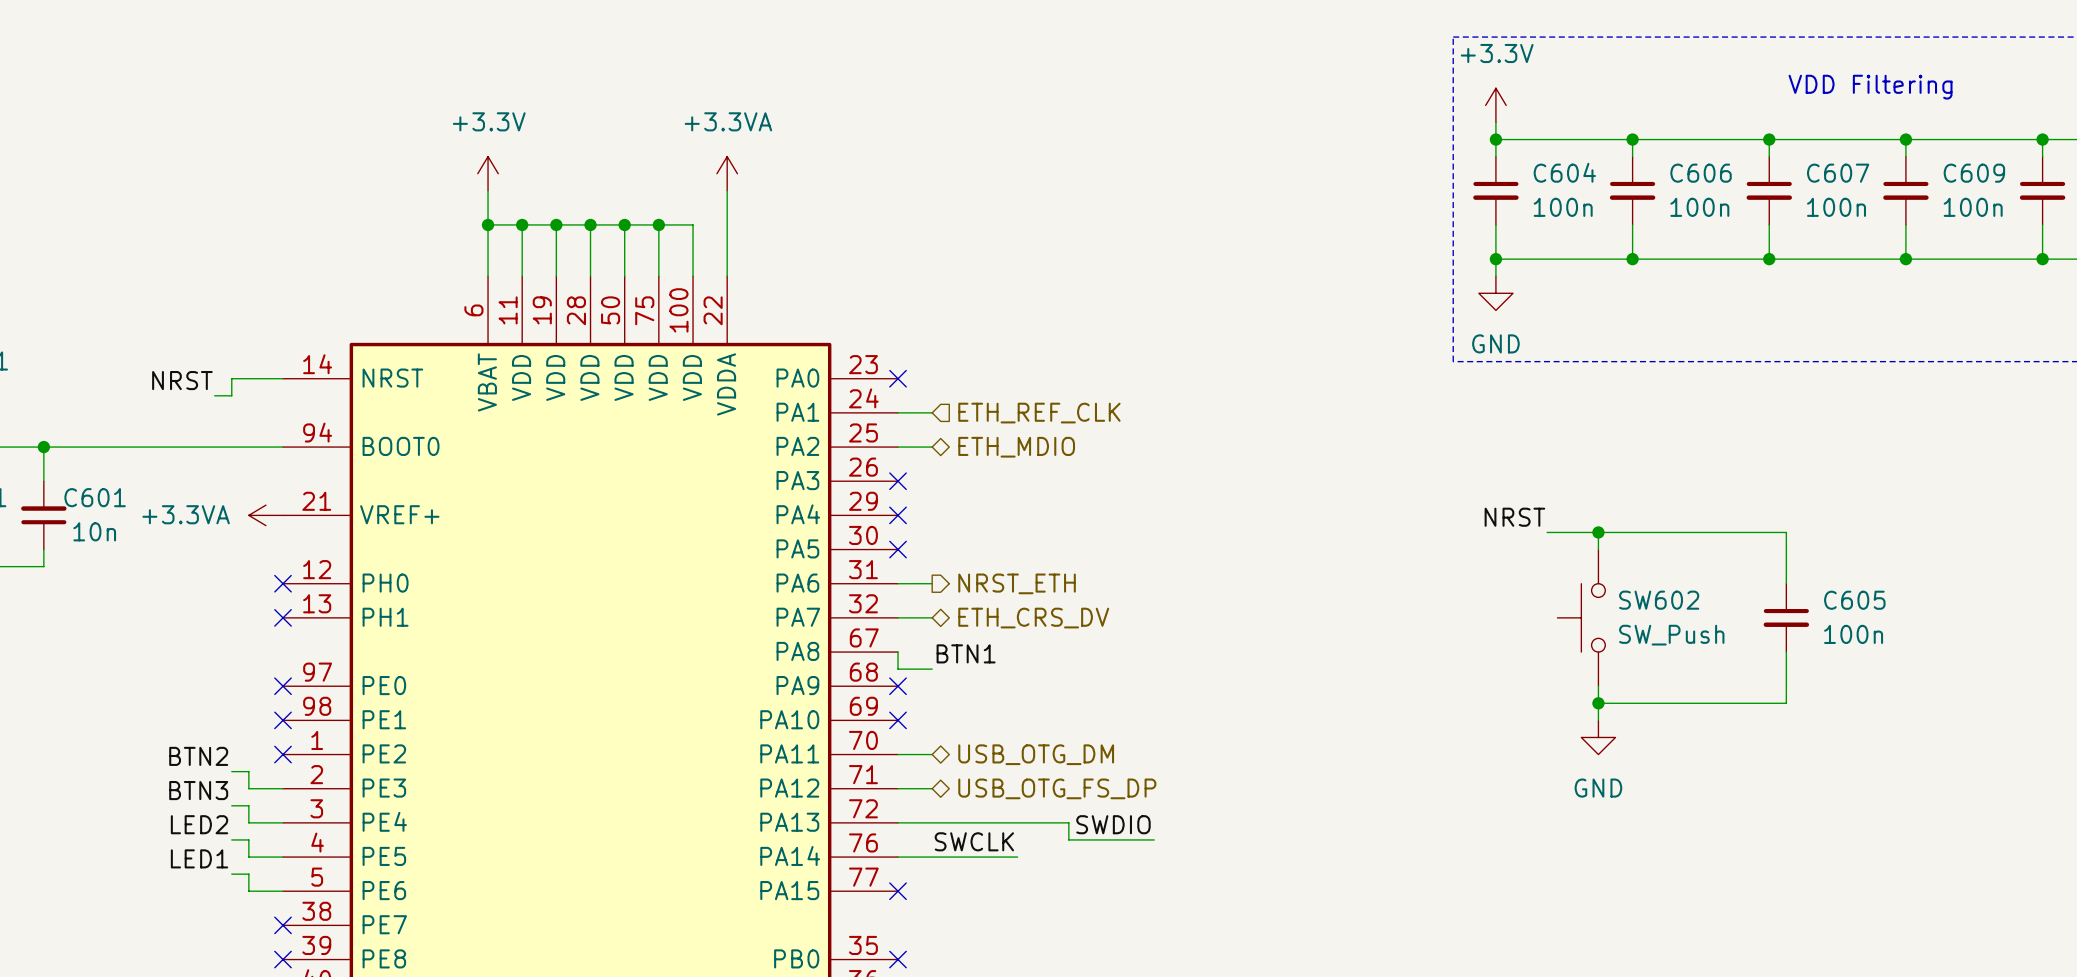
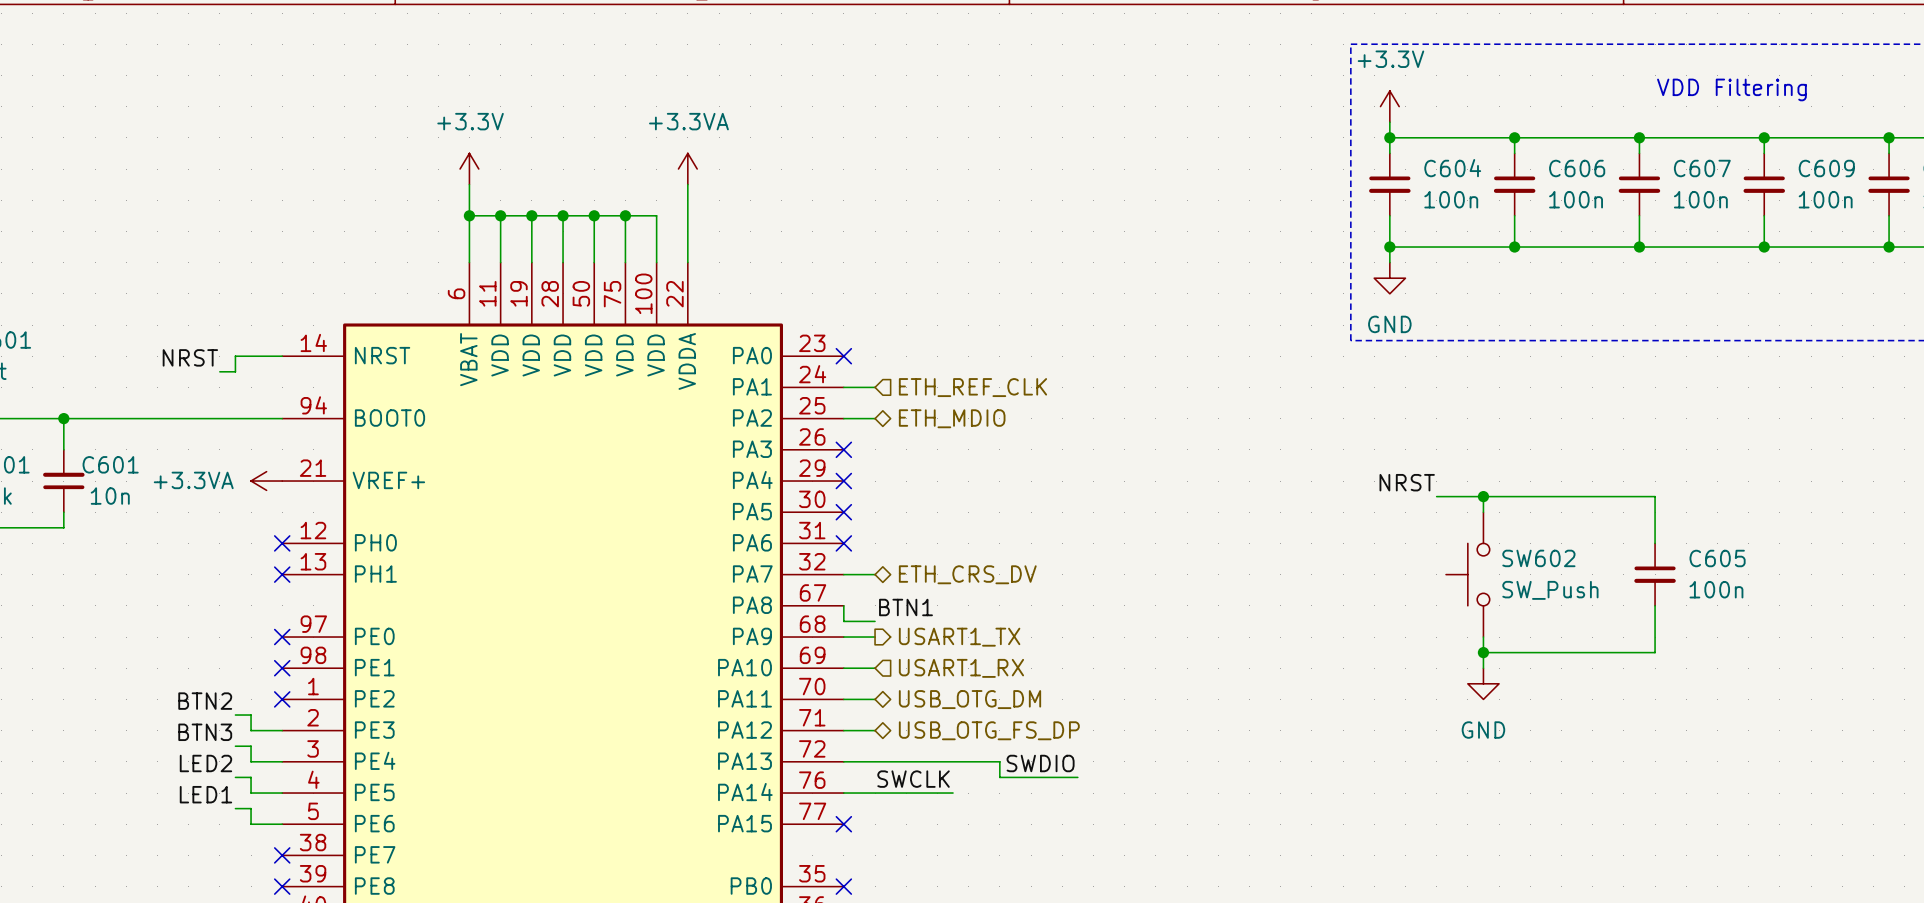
wire: (898, 583) (932, 583) -> (843, 637) (875, 637)
no-connect mark: none -> (843, 543)
hierarchical label: NRST_ETH (1017, 583) -> none
no-connect mark: (898, 686) -> none
hierarchical label: none -> USART1_TX (959, 637)
wire: none -> (843, 668) (875, 668)
no-connect mark: (898, 720) -> none
hierarchical label: none -> USART1_RX (961, 668)

